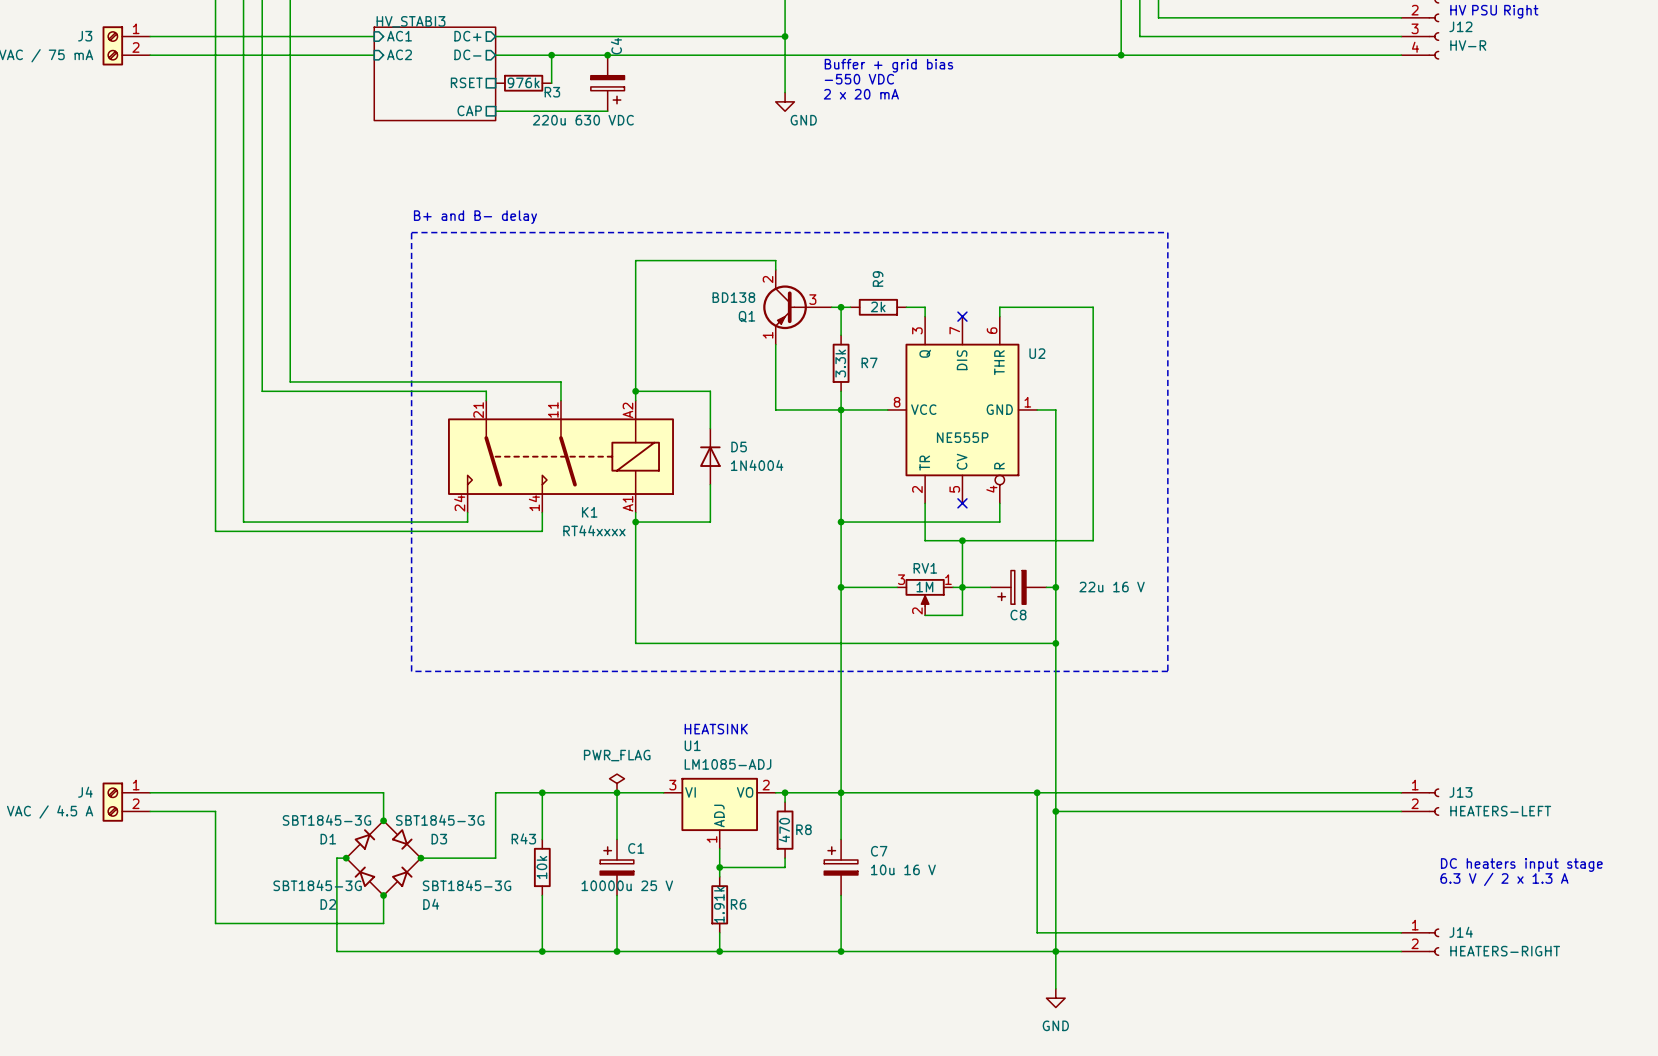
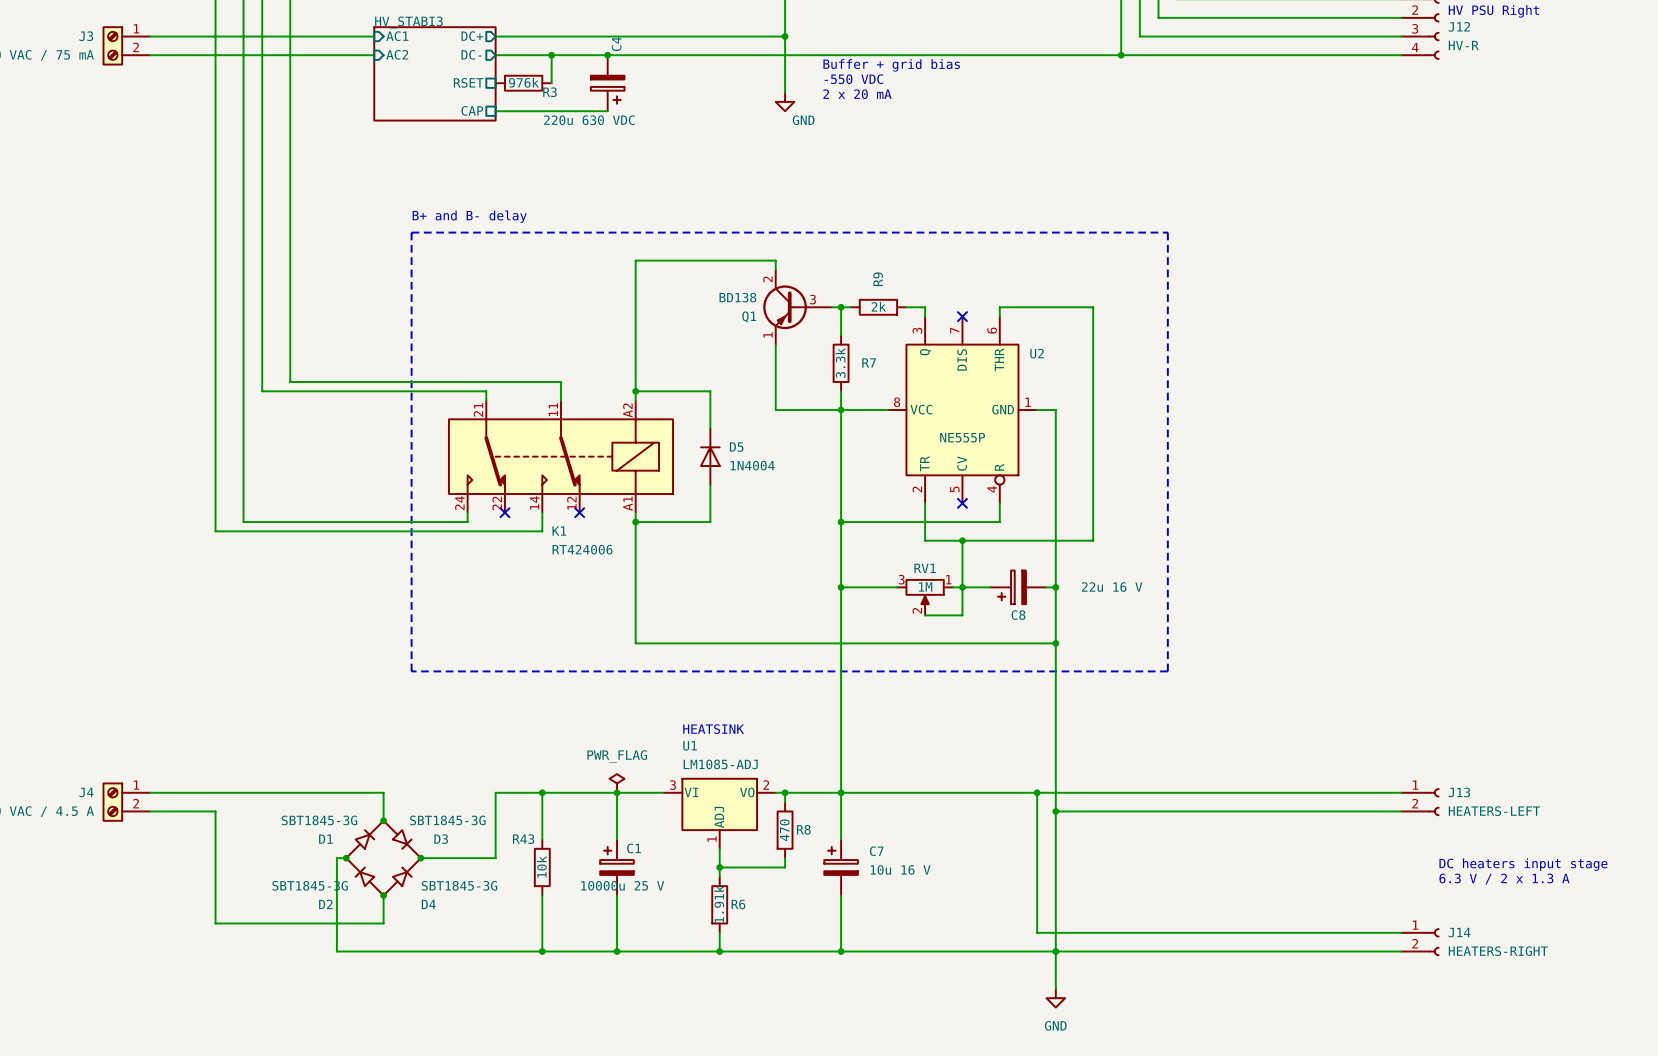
K1 symbol: [448, 400, 674, 513] -> [448, 400, 674, 513]
no-connect mark: none -> (504, 512)
no-connect mark: none -> (579, 512)
K1 name position: K1 (589, 512) -> K1 (559, 531)
K1 value: RT44xxxx (594, 530) -> RT424006 (582, 549)

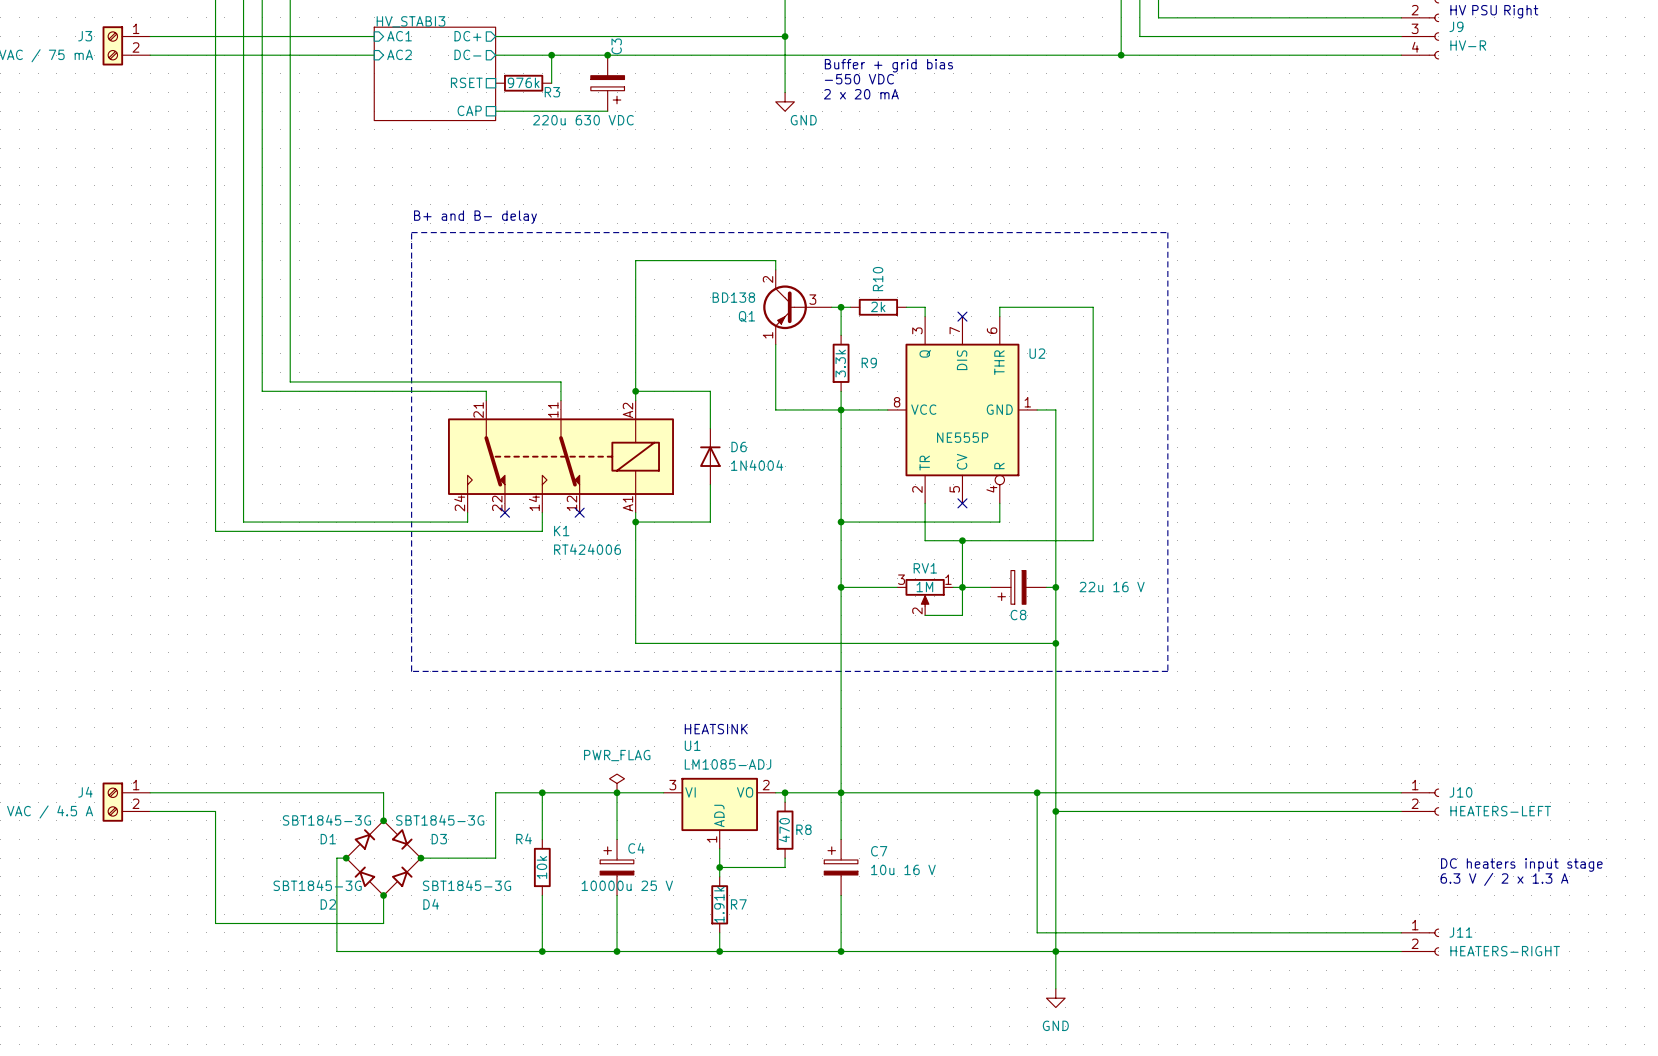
J12 name: J12 (1459, 26) -> J9 (1456, 26)
C4 name: C4 (616, 44) -> C3 (616, 46)
R9 name: R9 (878, 279) -> R10 (878, 279)
R7 name: R7 (869, 362) -> R9 (869, 362)
D5 name: D5 (736, 447) -> D6 (739, 446)
J13 name: J13 (1459, 792) -> J10 (1460, 792)
R43 name: R43 (523, 839) -> R4 (524, 838)
C1 name: C1 (634, 848) -> C4 (636, 848)
R6 name: R6 (738, 904) -> R7 (738, 904)
J14 name: J14 (1459, 932) -> J11 (1460, 932)

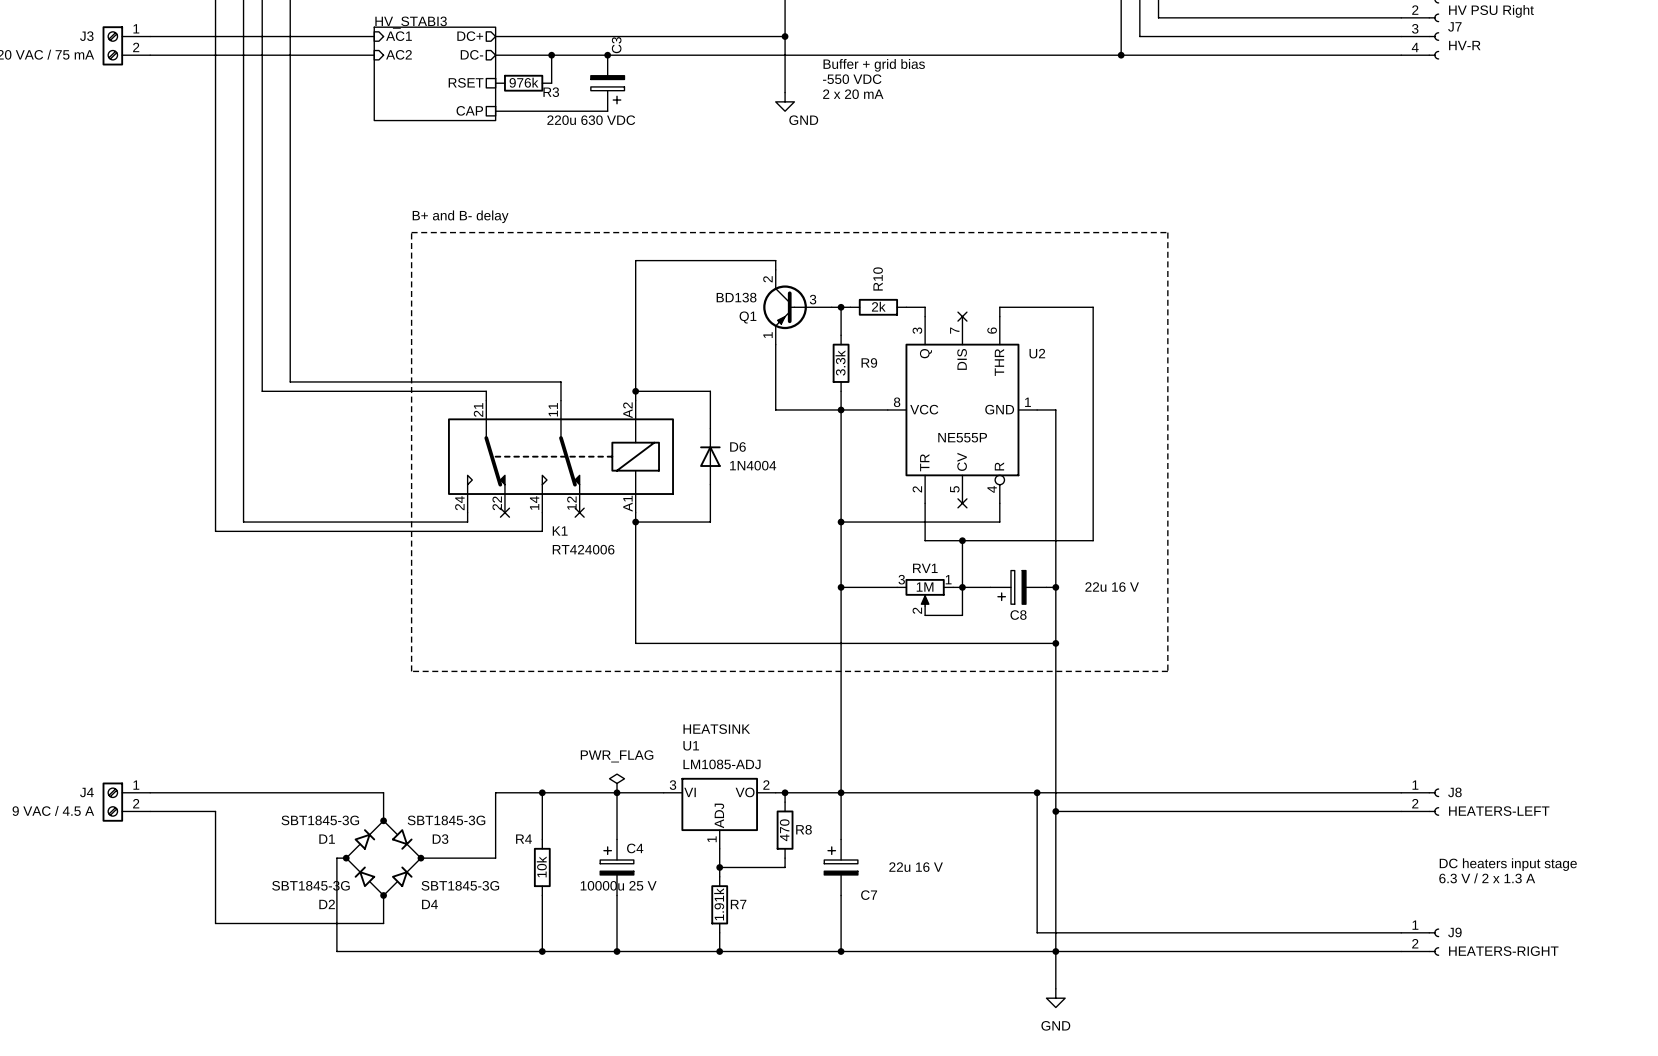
J9 name: J9 (1456, 26) -> J7 (1454, 26)
J10 name: J10 (1460, 792) -> J8 (1454, 792)
C7 name position: C7 (879, 851) -> C7 (869, 895)
C7 value: 10u 16 V (903, 869) -> 22u 16 V (916, 867)
J11 name: J11 (1460, 932) -> J9 (1454, 932)

